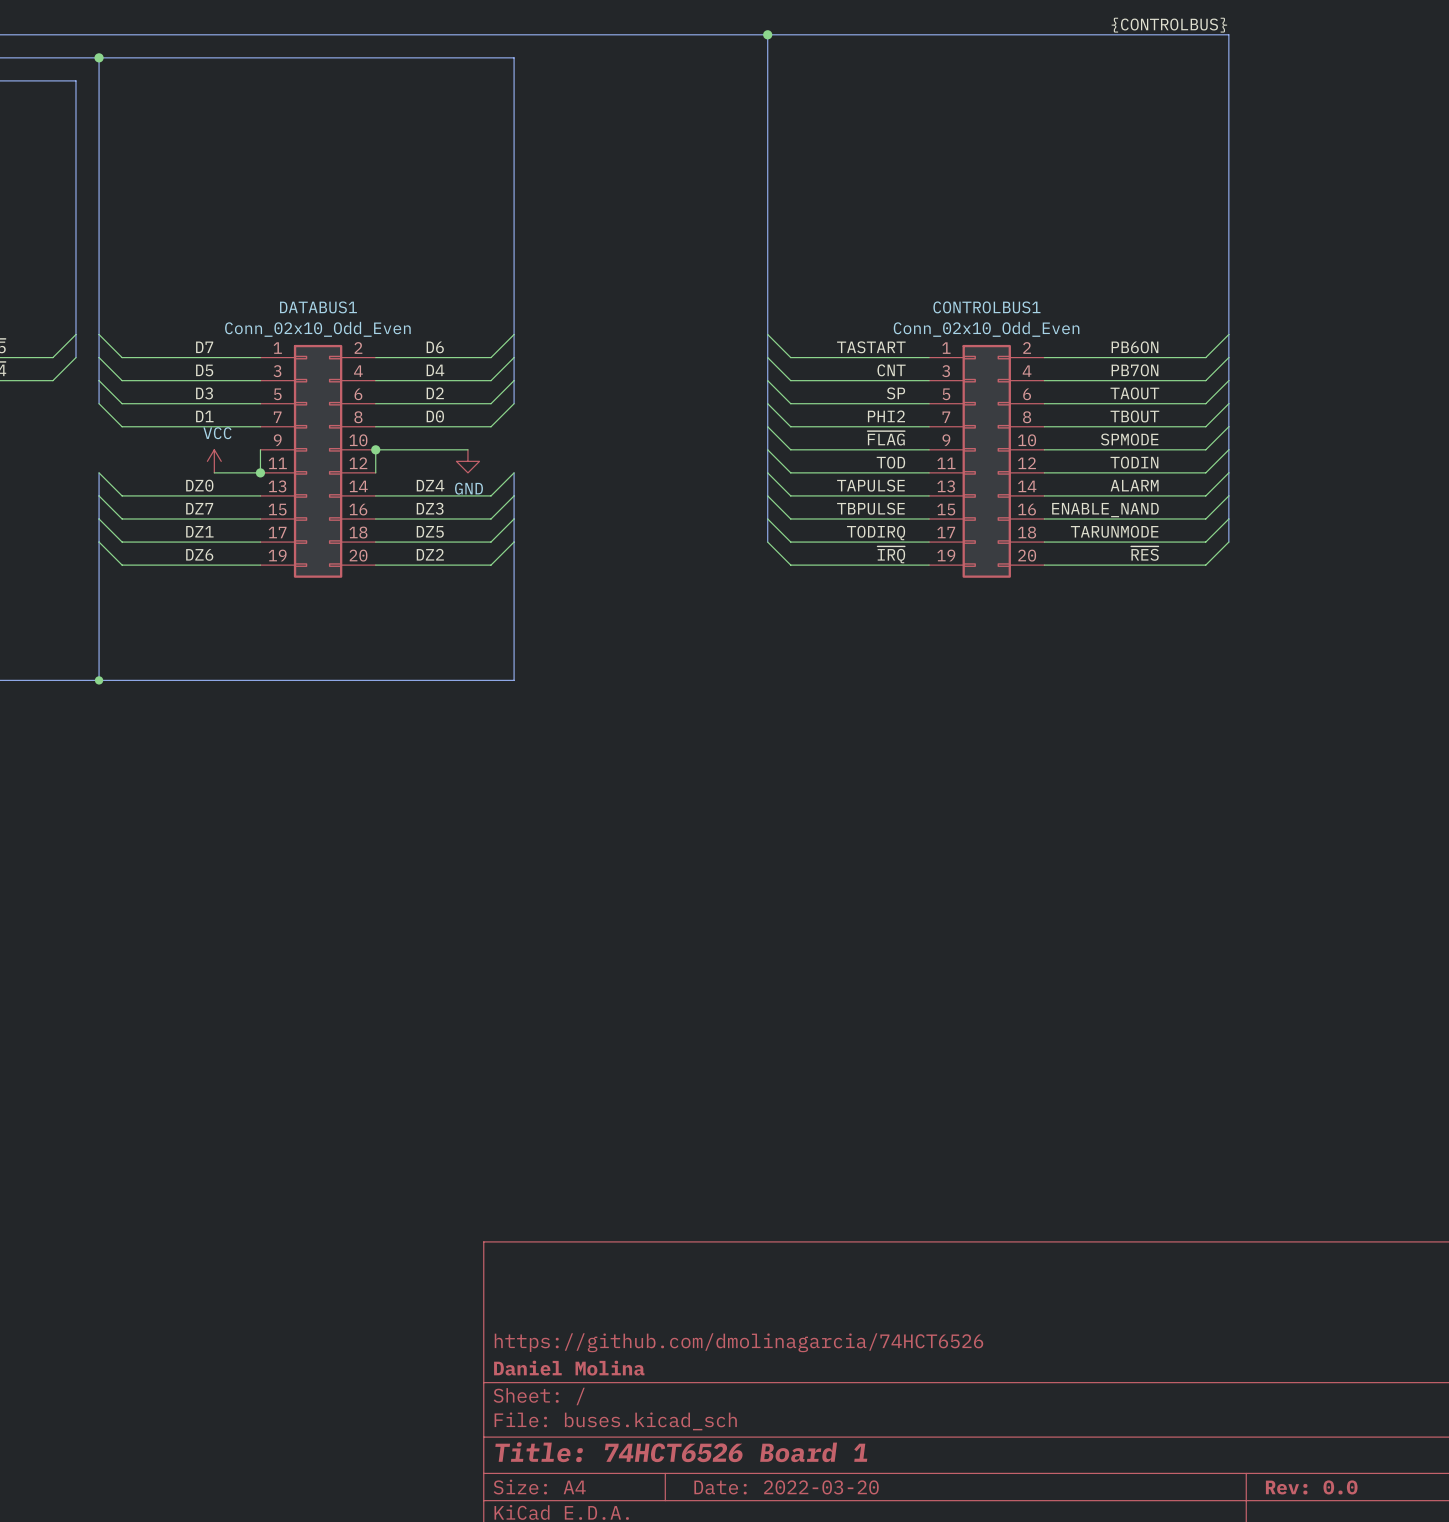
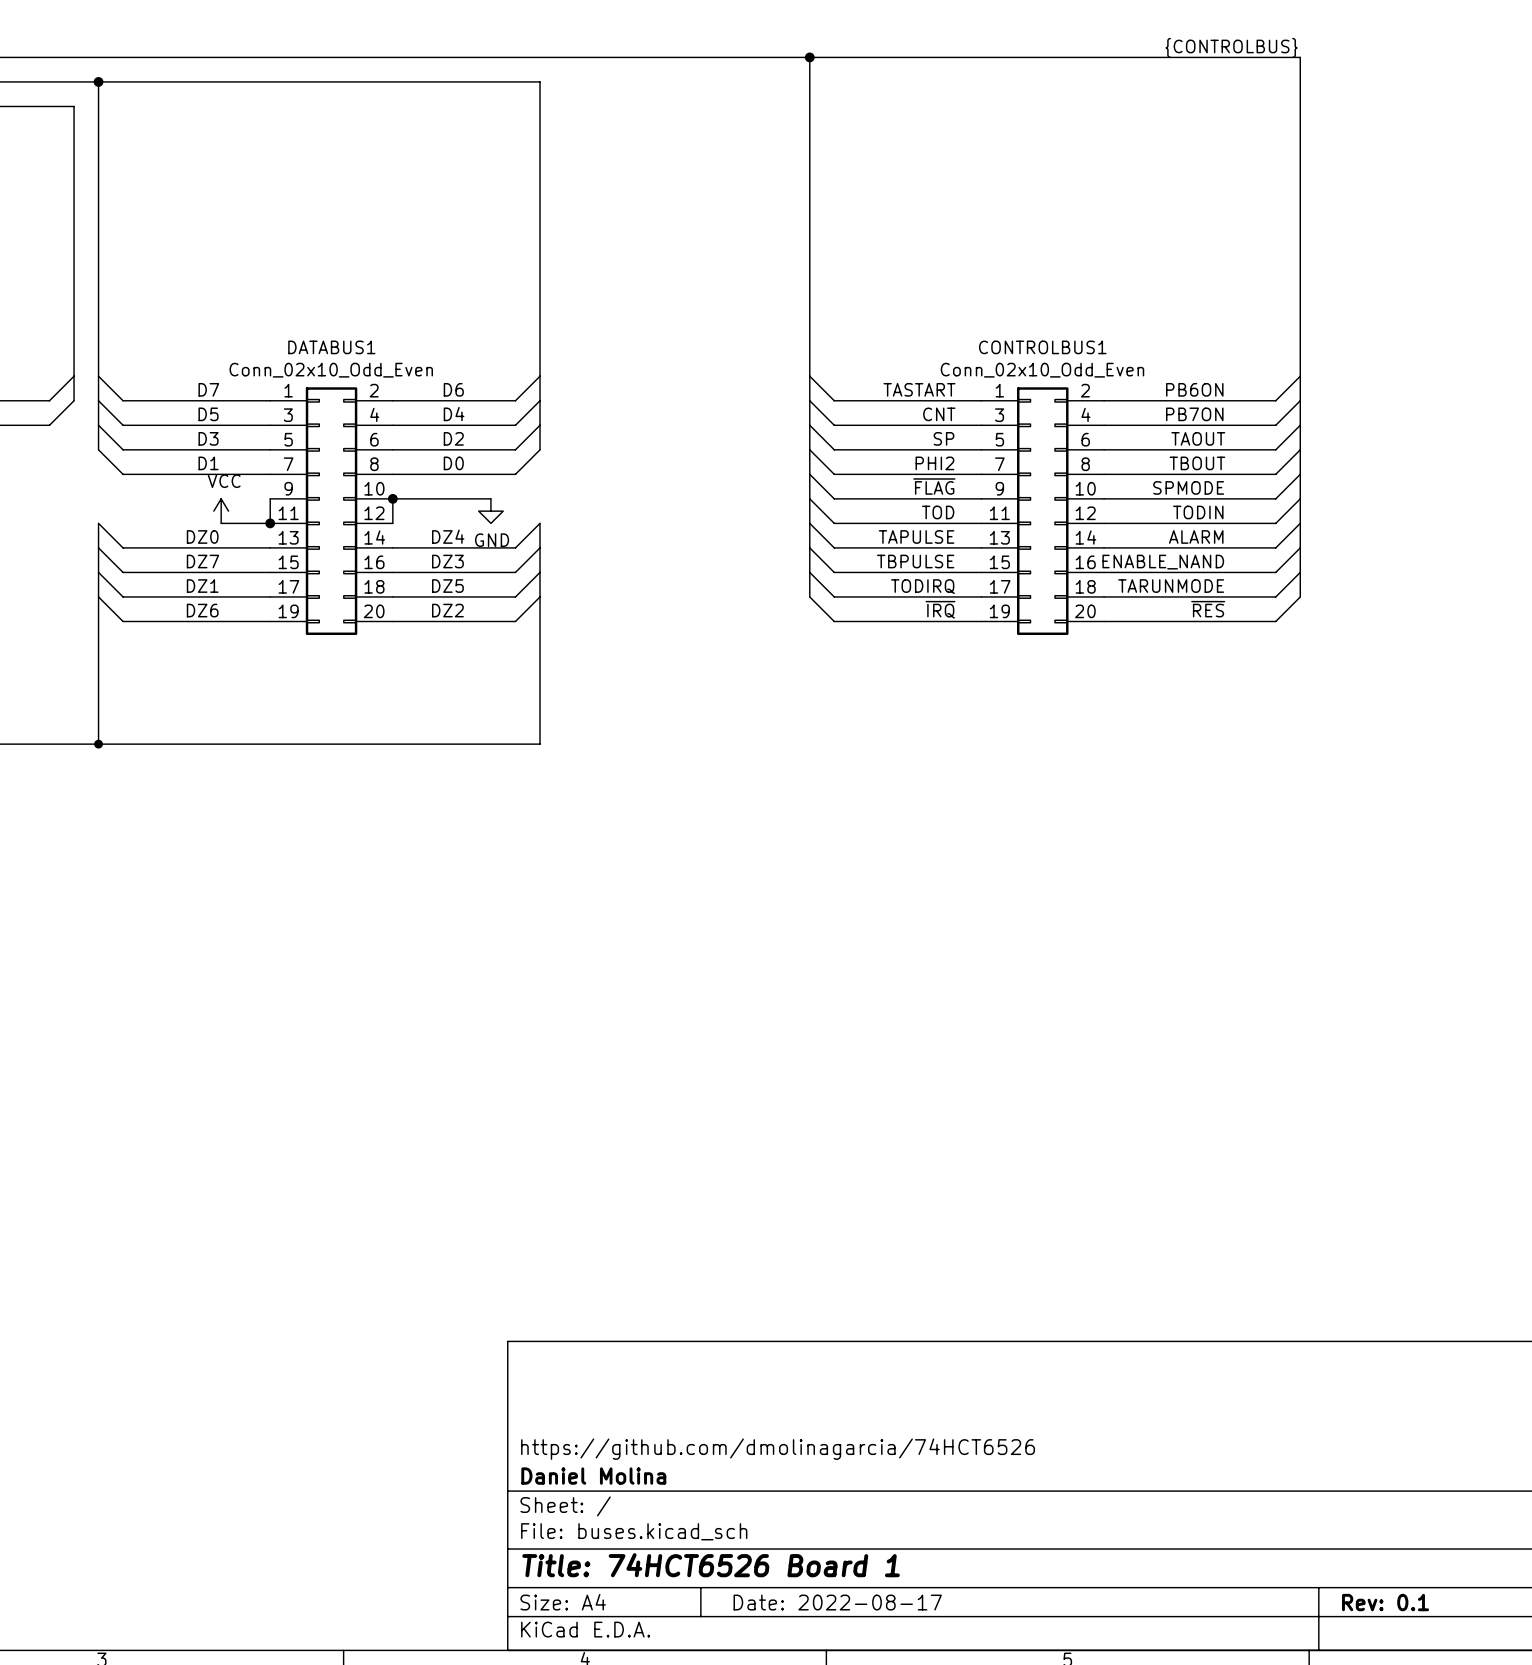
title block: Date: 2022-03-20 (786, 1487) -> Date: 2022-08-17 (837, 1602)
title block: Rev: 0.0 (1311, 1487) -> Rev: 0.1 (1385, 1602)

